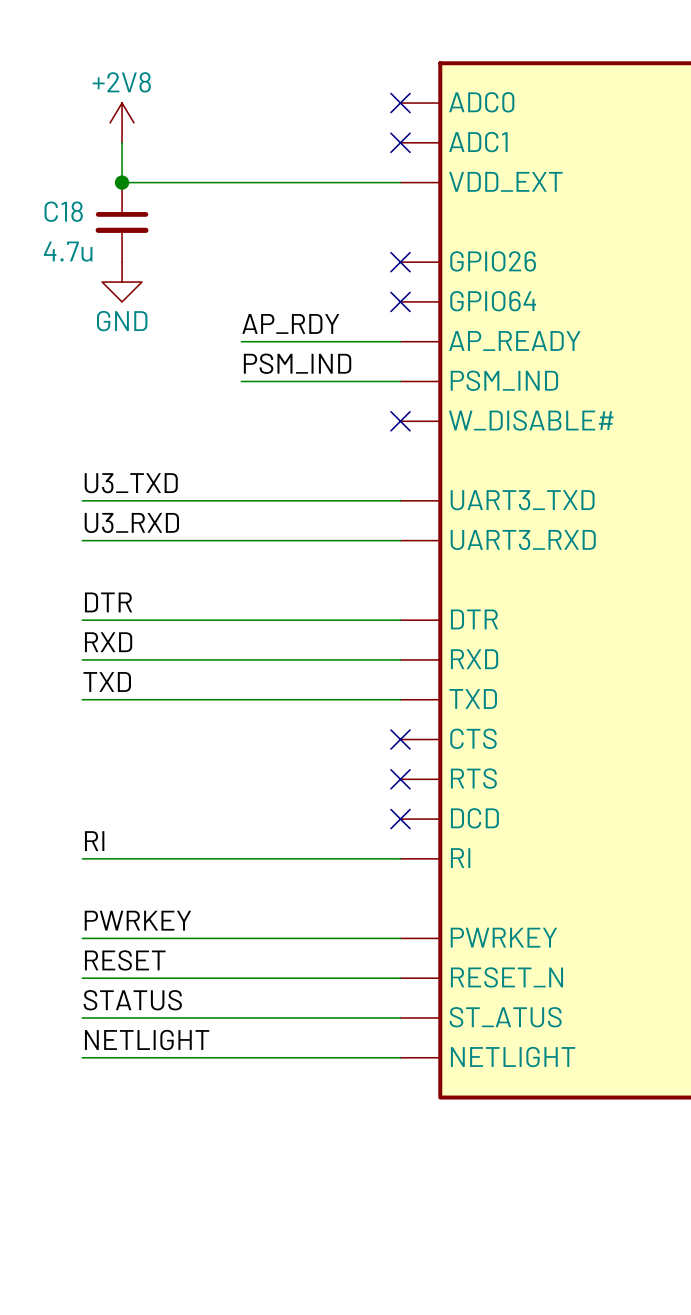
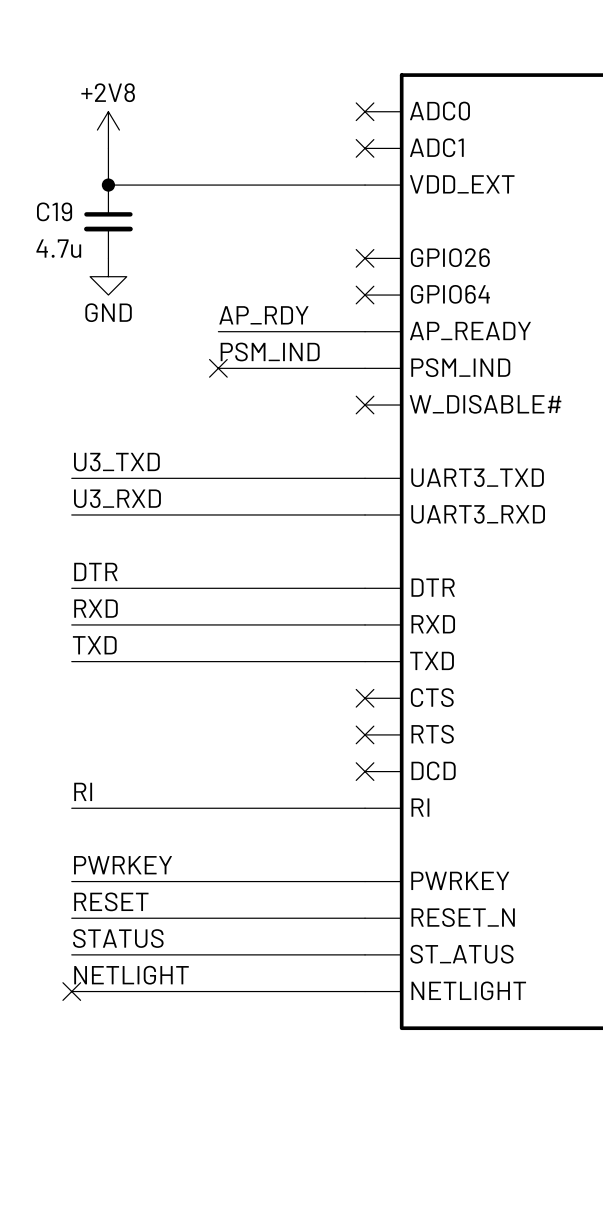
C18 name: C18 (63, 211) -> C19 (54, 211)
no-connect mark: none -> (218, 368)
no-connect mark: none -> (71, 991)

